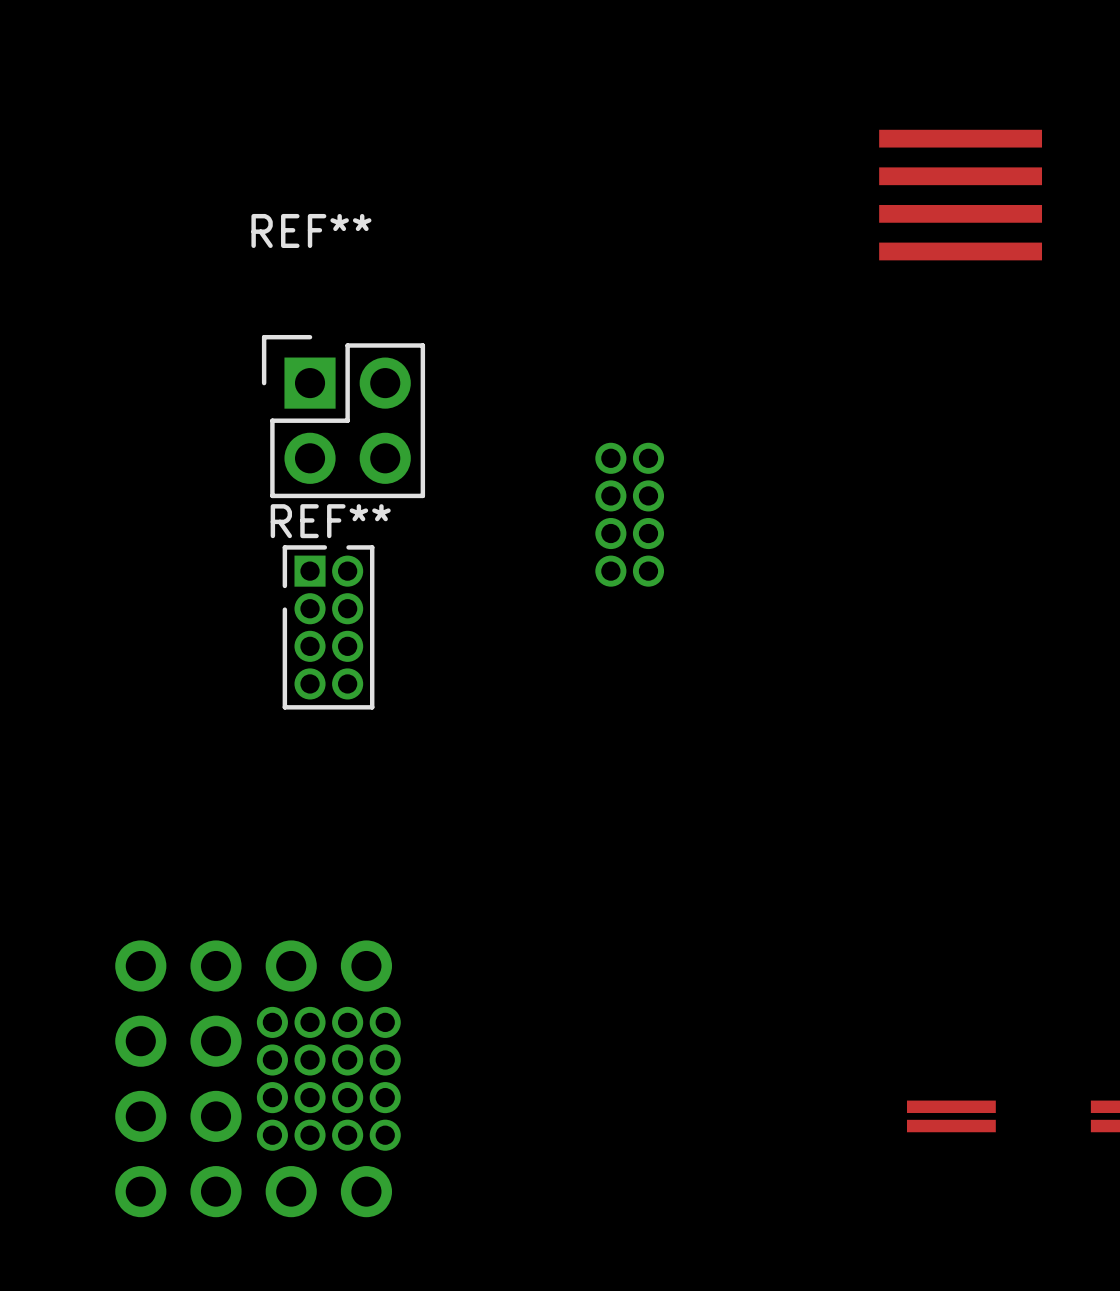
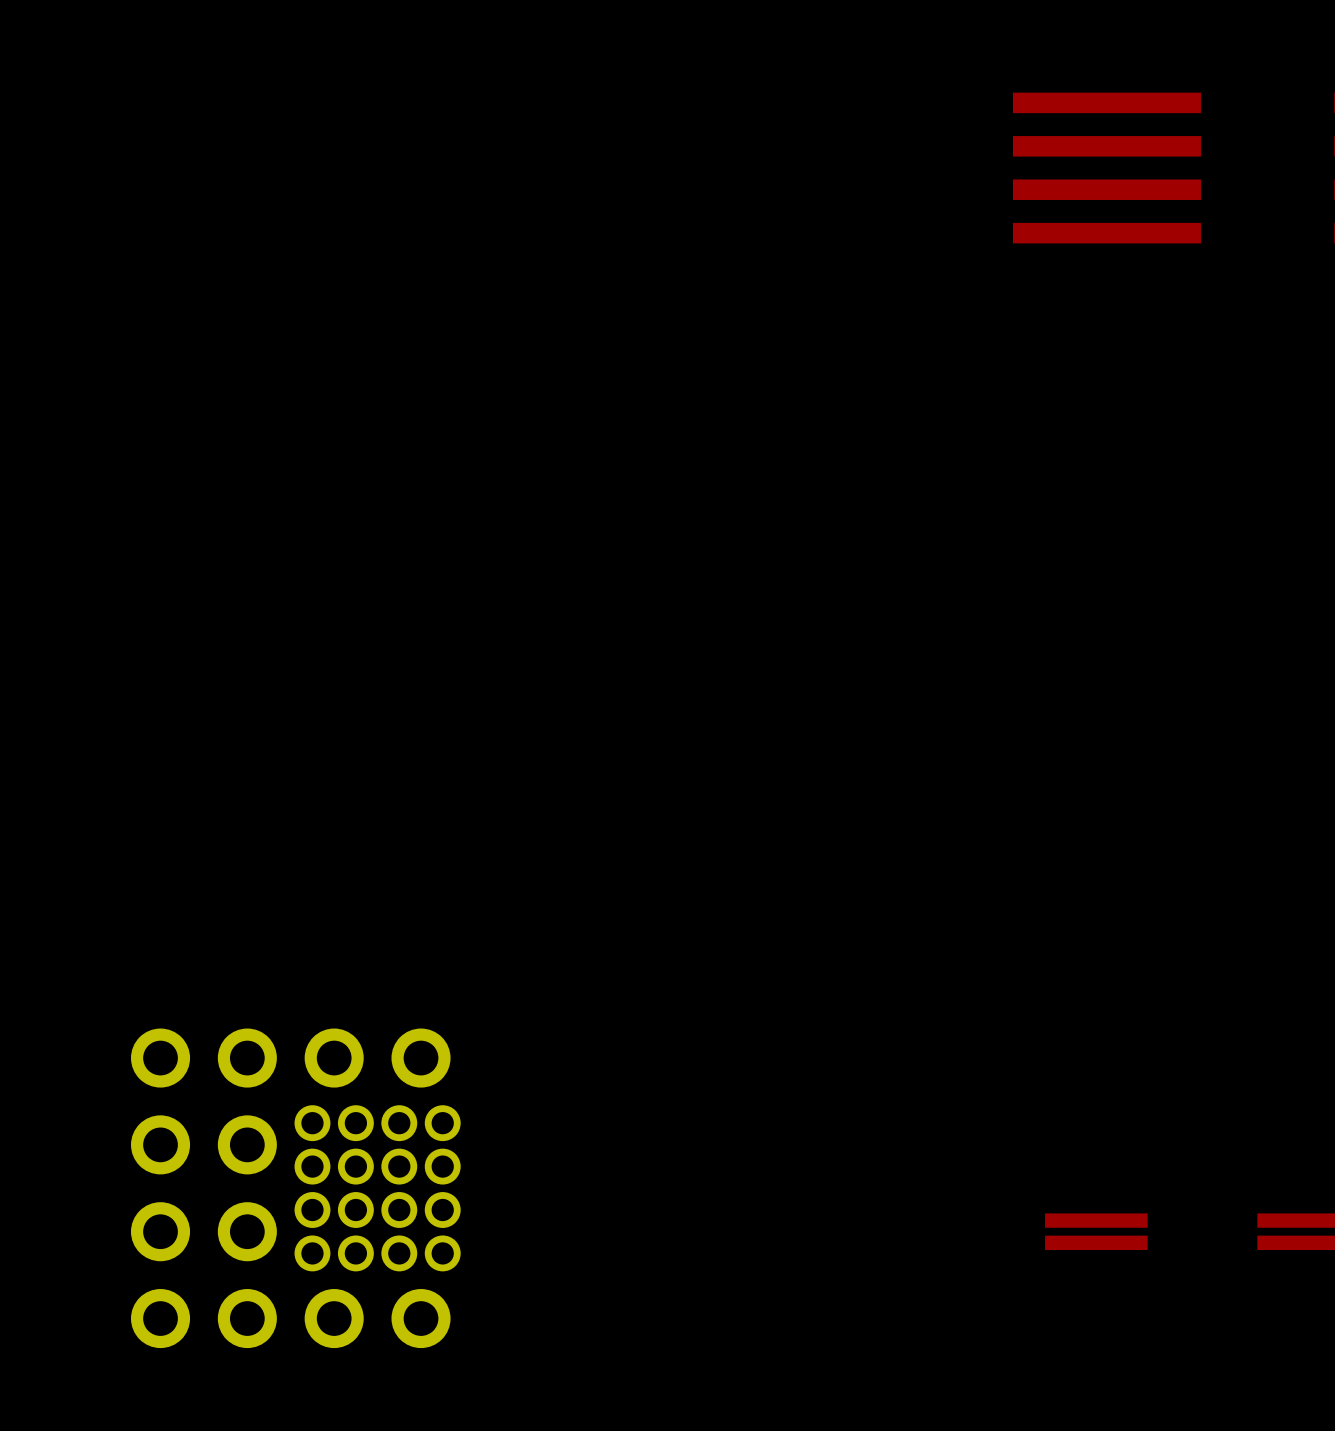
REF**: (343, 416) -> none
part: (610, 458) -> none
part: (648, 458) -> none
part: (610, 495) -> none
part: (648, 495) -> none
part: (610, 533) -> none
part: (648, 533) -> none
part: (610, 571) -> none
part: (648, 571) -> none
REF**: (328, 627) -> none

